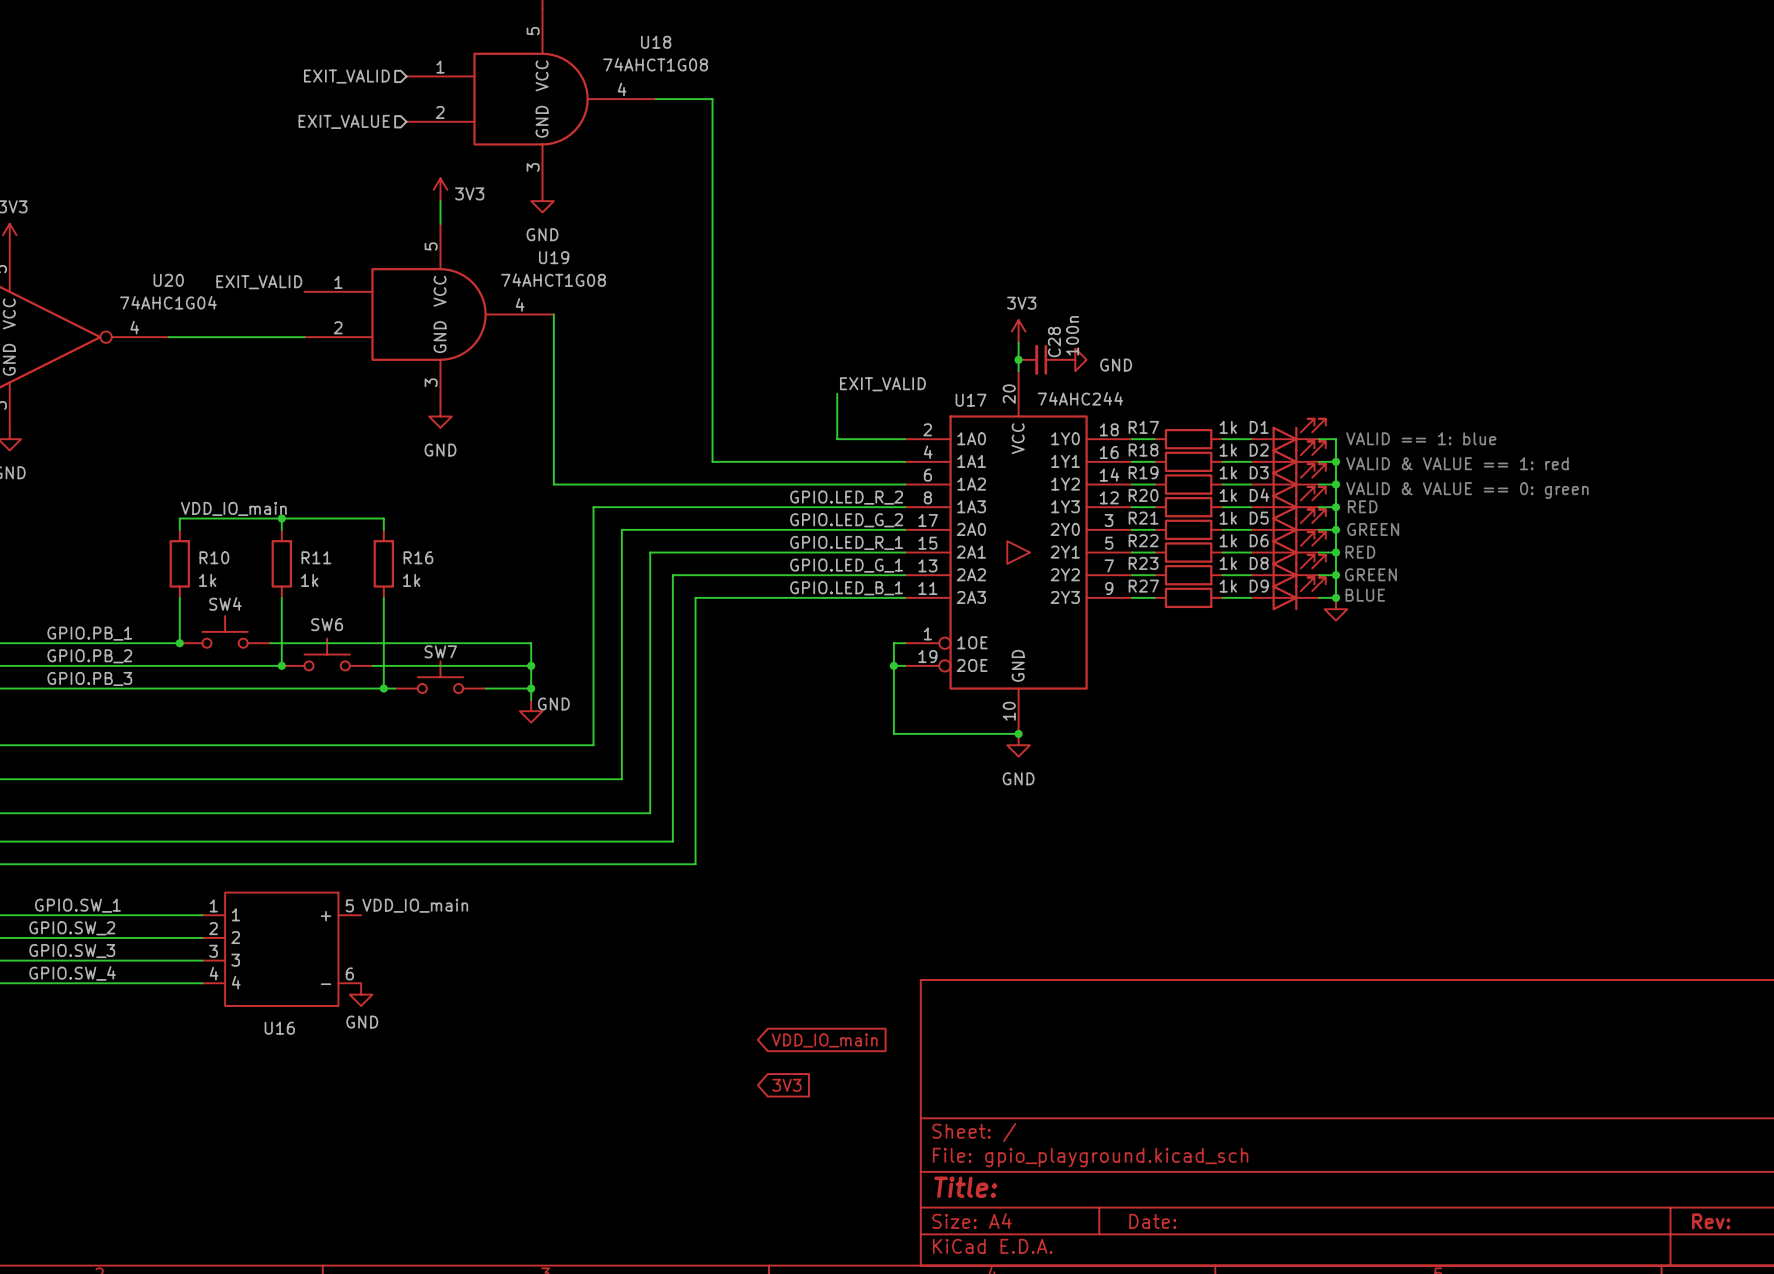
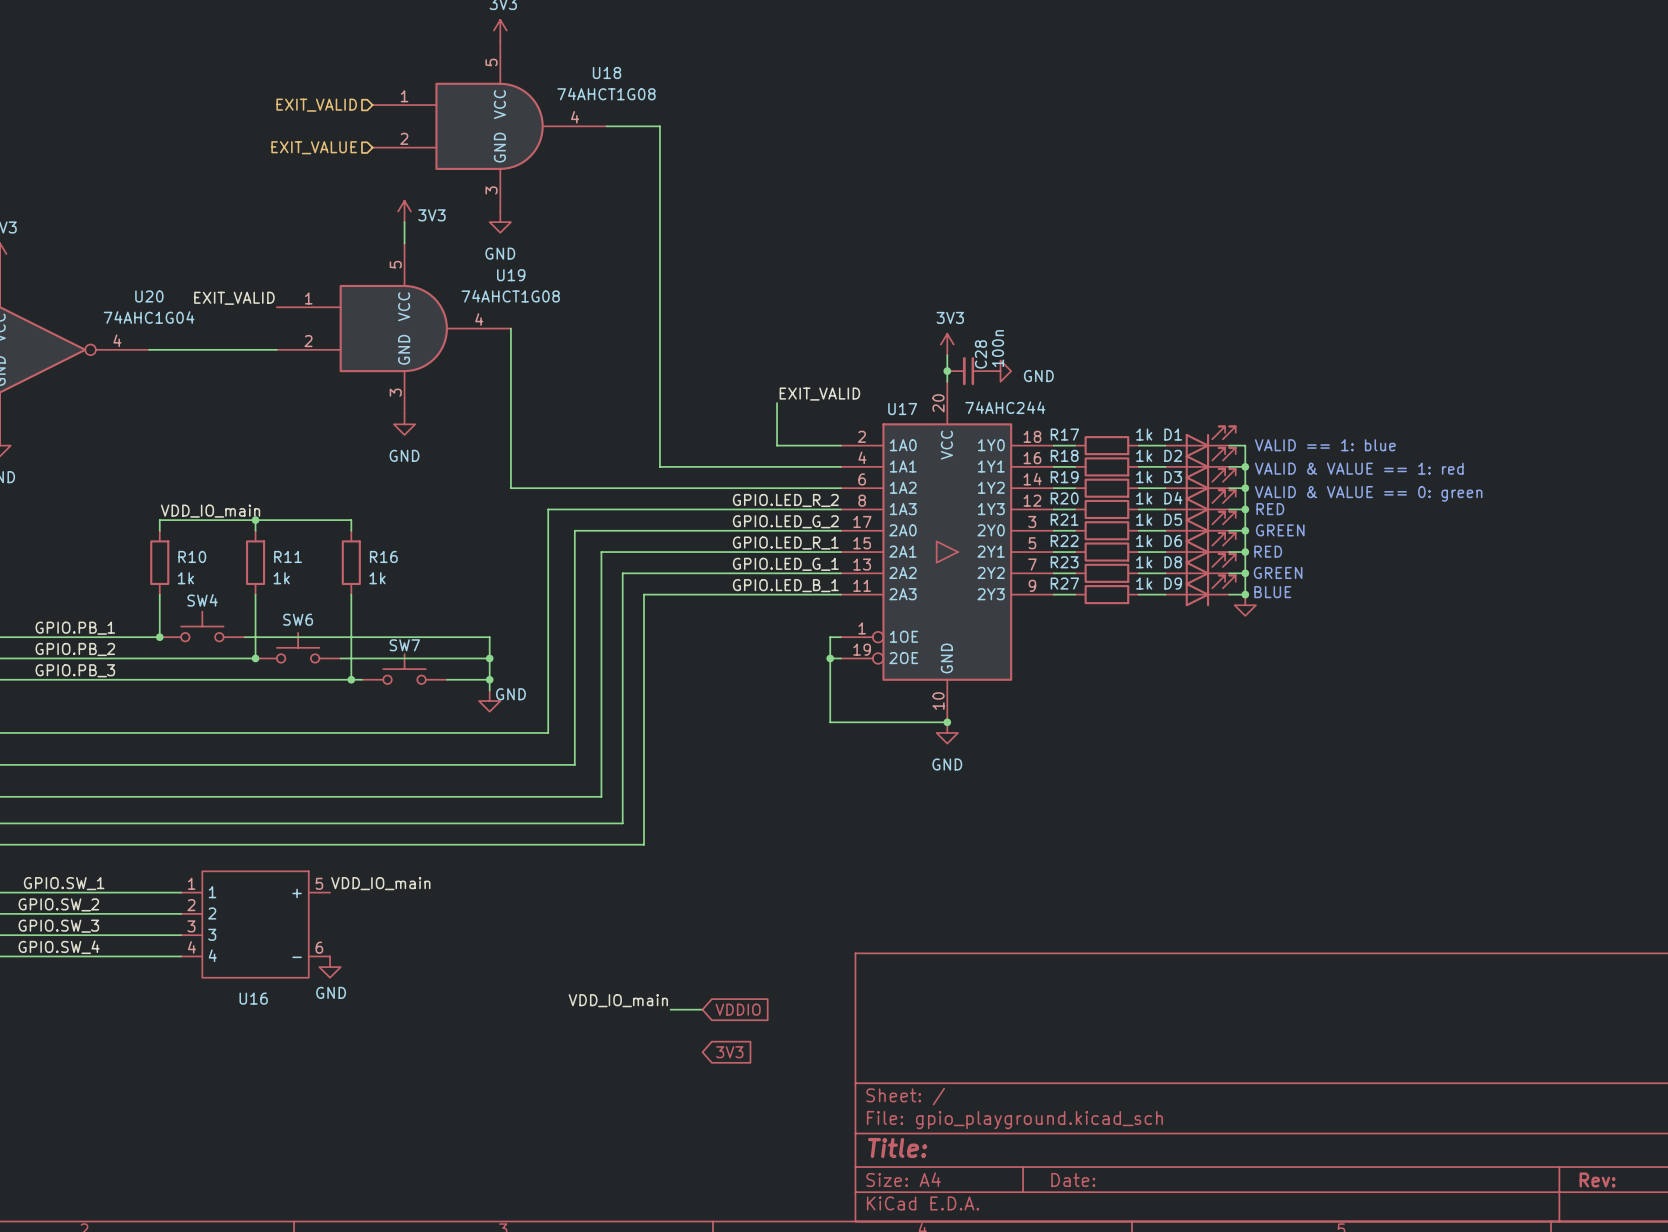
label: none -> VDD_IO_main (618, 1000)
wire: none -> (670, 1009) (702, 1009)
global label: VDD_IO_main (824, 1040) -> VDDIO (738, 1009)

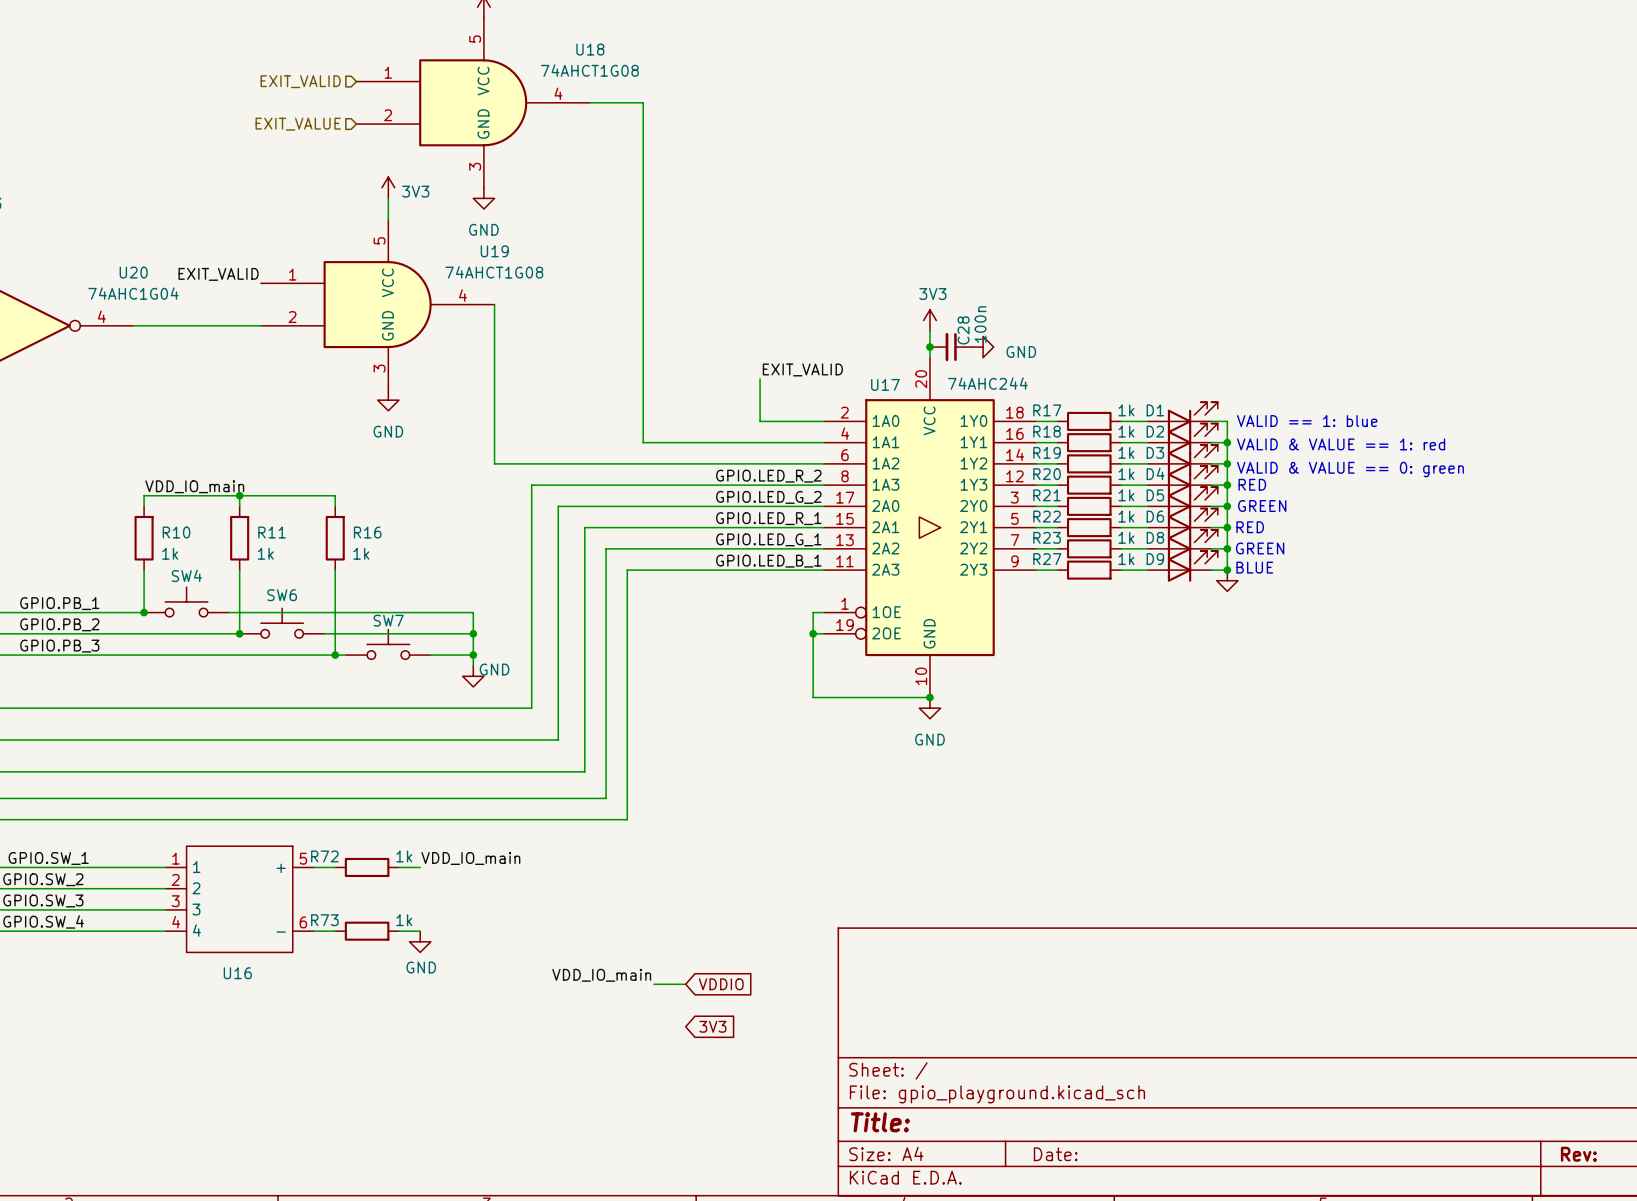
label position: VDD_IO_main (380, 883) -> VDD_IO_main (470, 858)
wire: none -> (314, 867) (335, 867)
R72: none -> 1k (367, 867)
wire: none -> (398, 867) (420, 867)
wire: none -> (314, 931) (335, 931)
R73: none -> 1k (367, 931)
wire: none -> (398, 931) (420, 931)
power symbol position: GND (330, 967) -> GND (420, 941)

